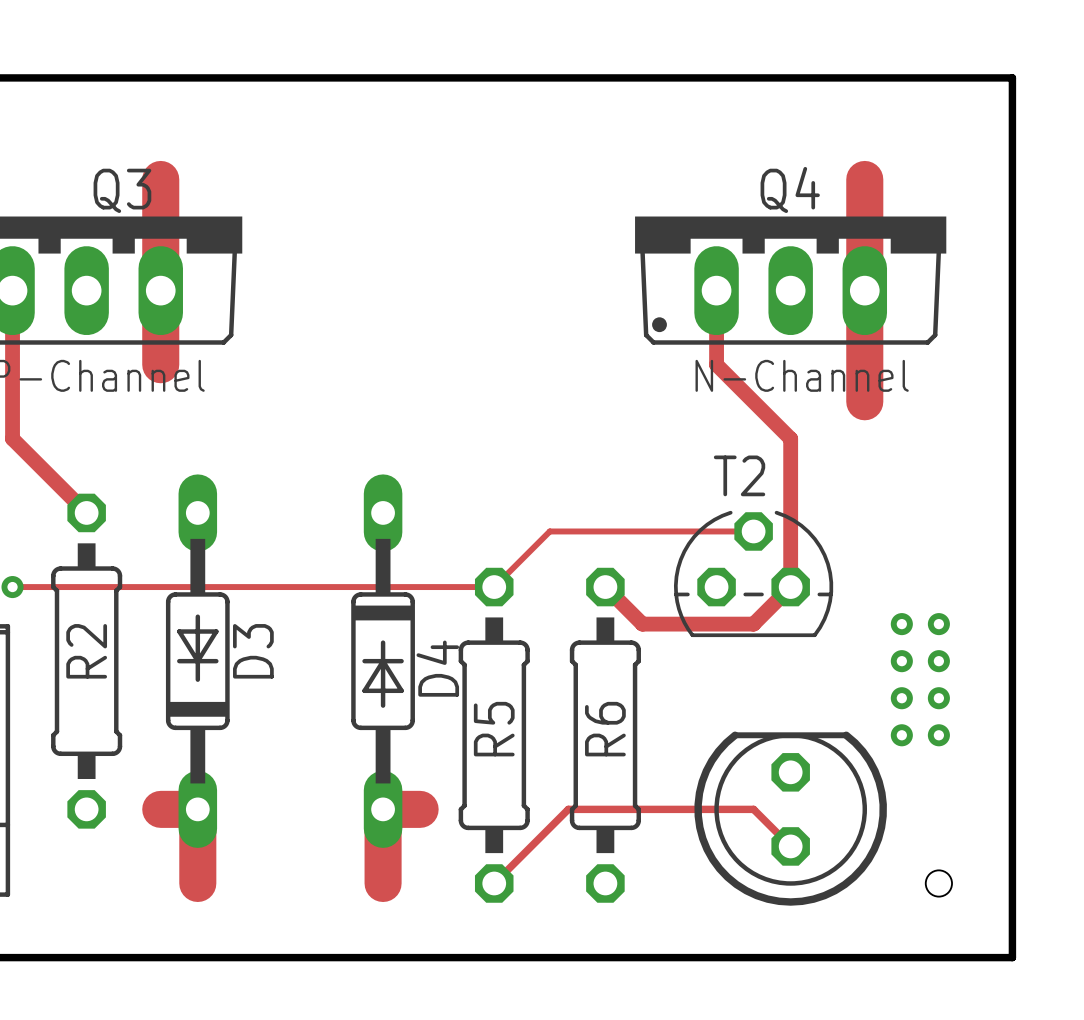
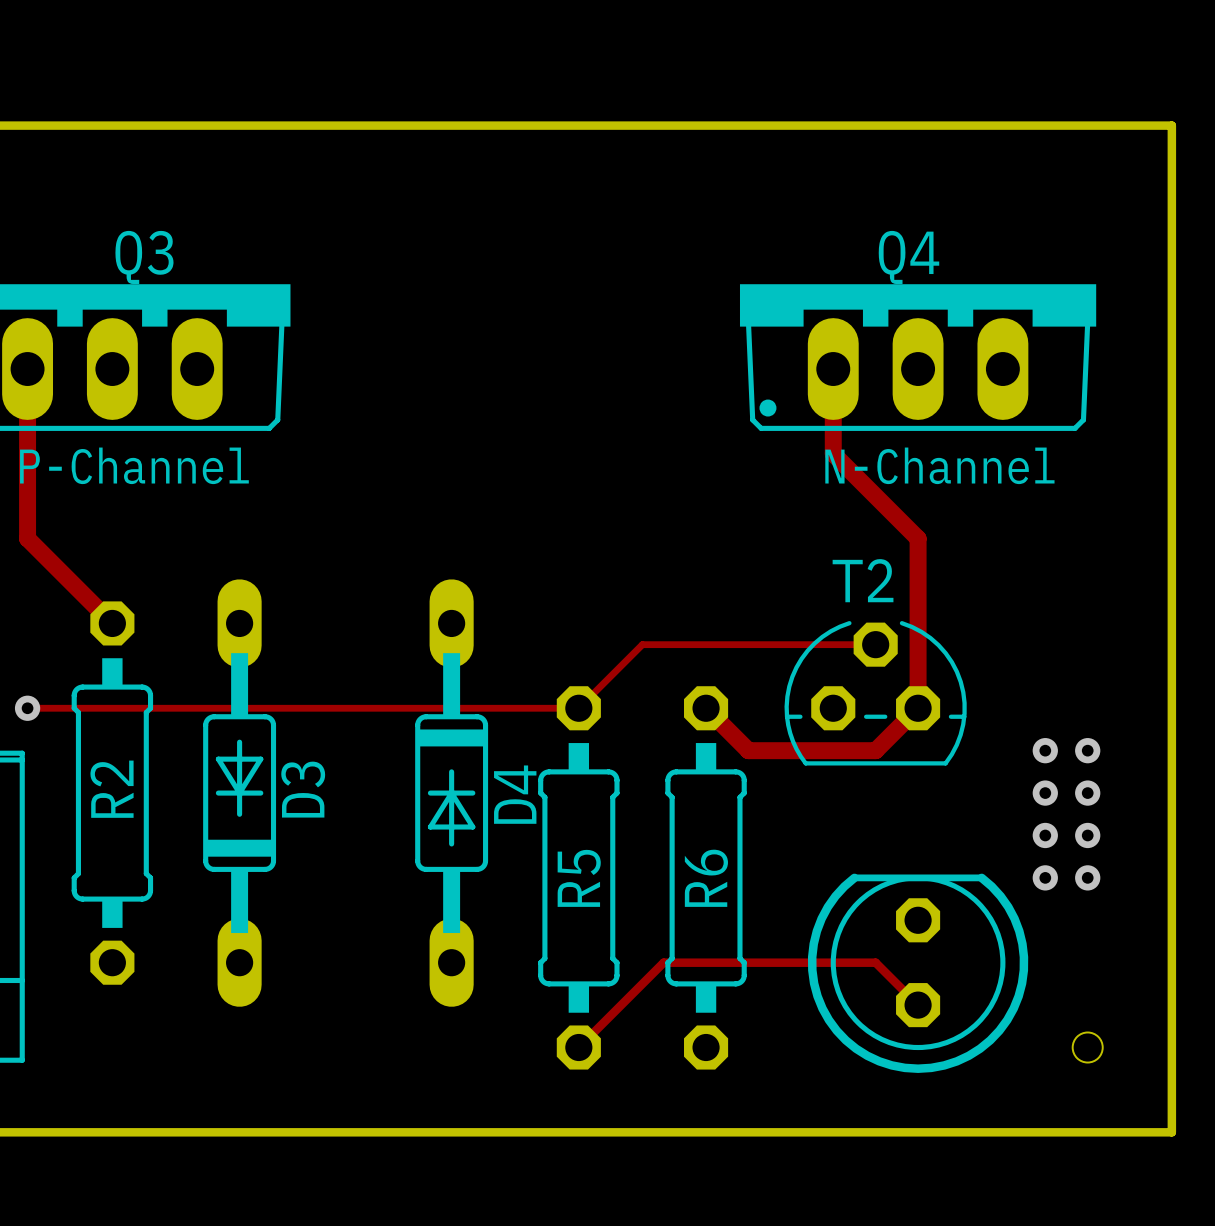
track: (160, 179) (160, 364) -> none
track: (864, 179) (864, 401) -> none
track: (160, 809) (197, 809) (197, 883) -> none
track: (420, 809) (383, 809) (383, 883) -> none

